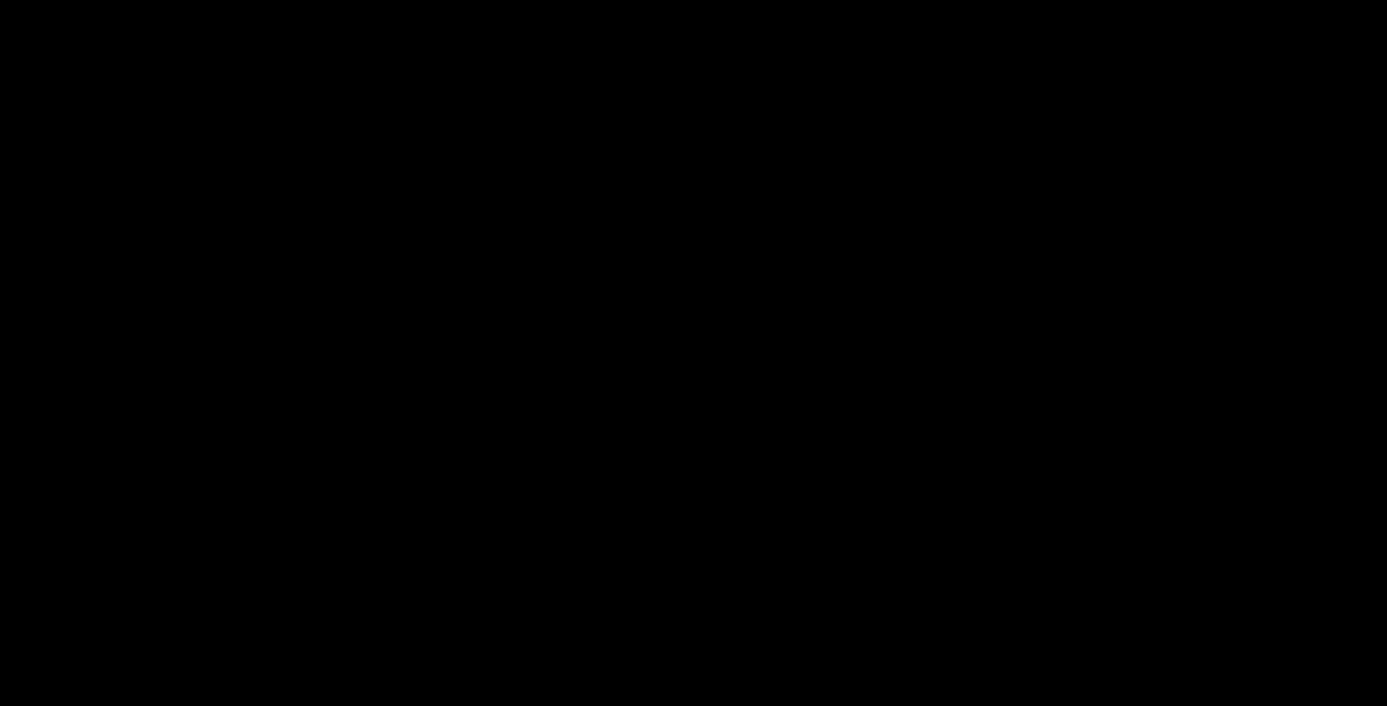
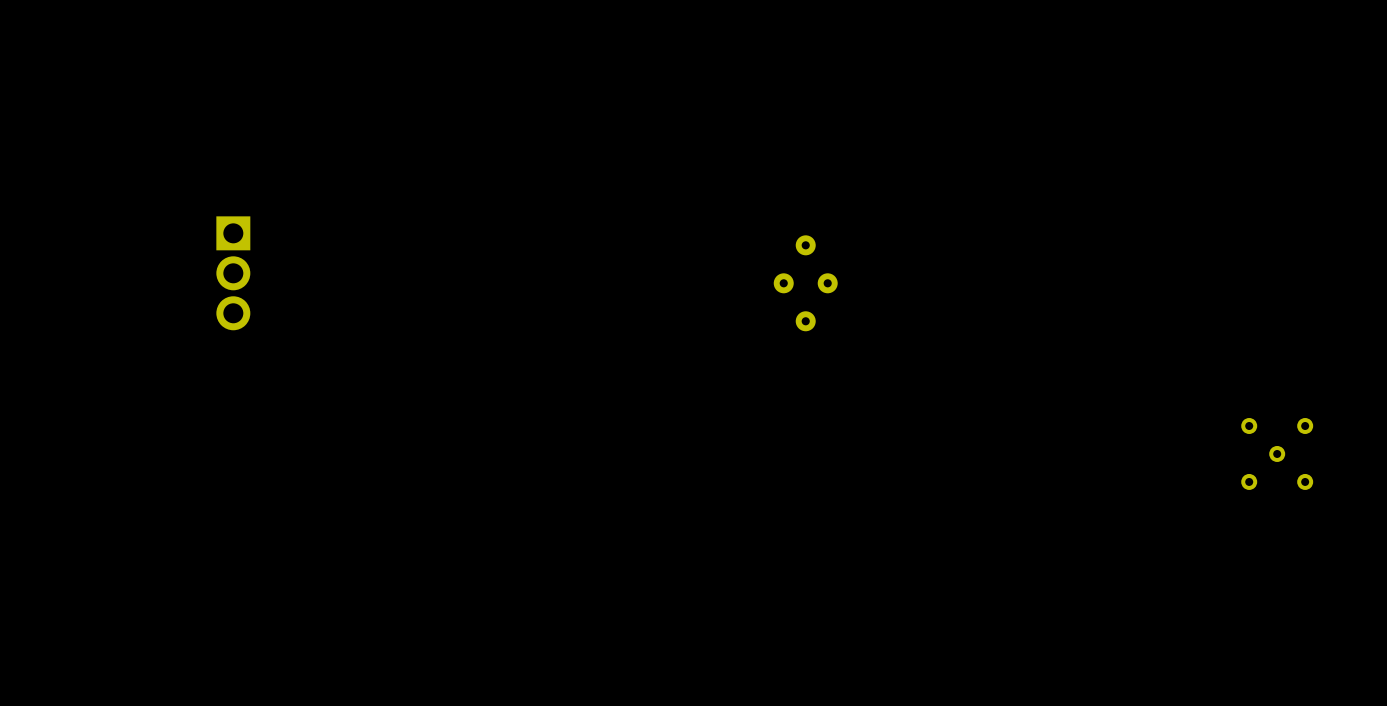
part: none -> (233, 273)
part: none -> (805, 283)
part: none -> (1277, 453)

